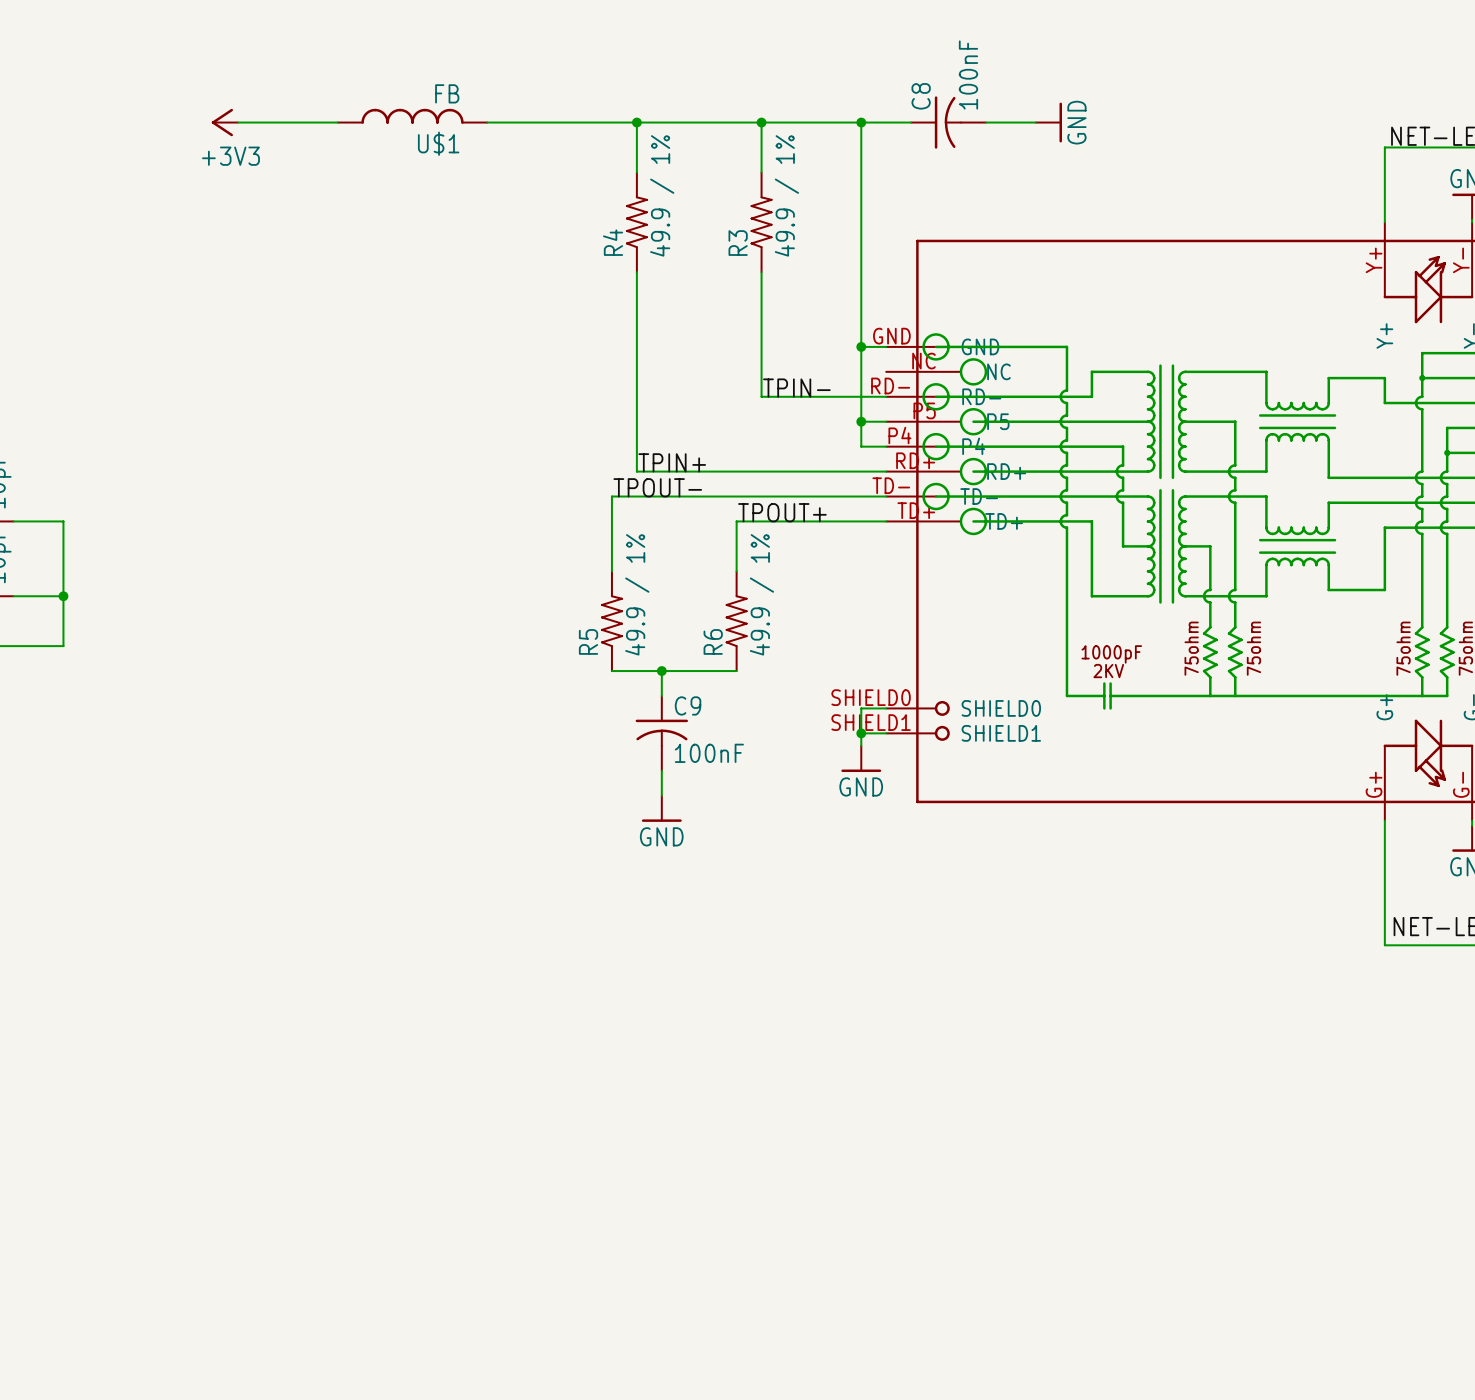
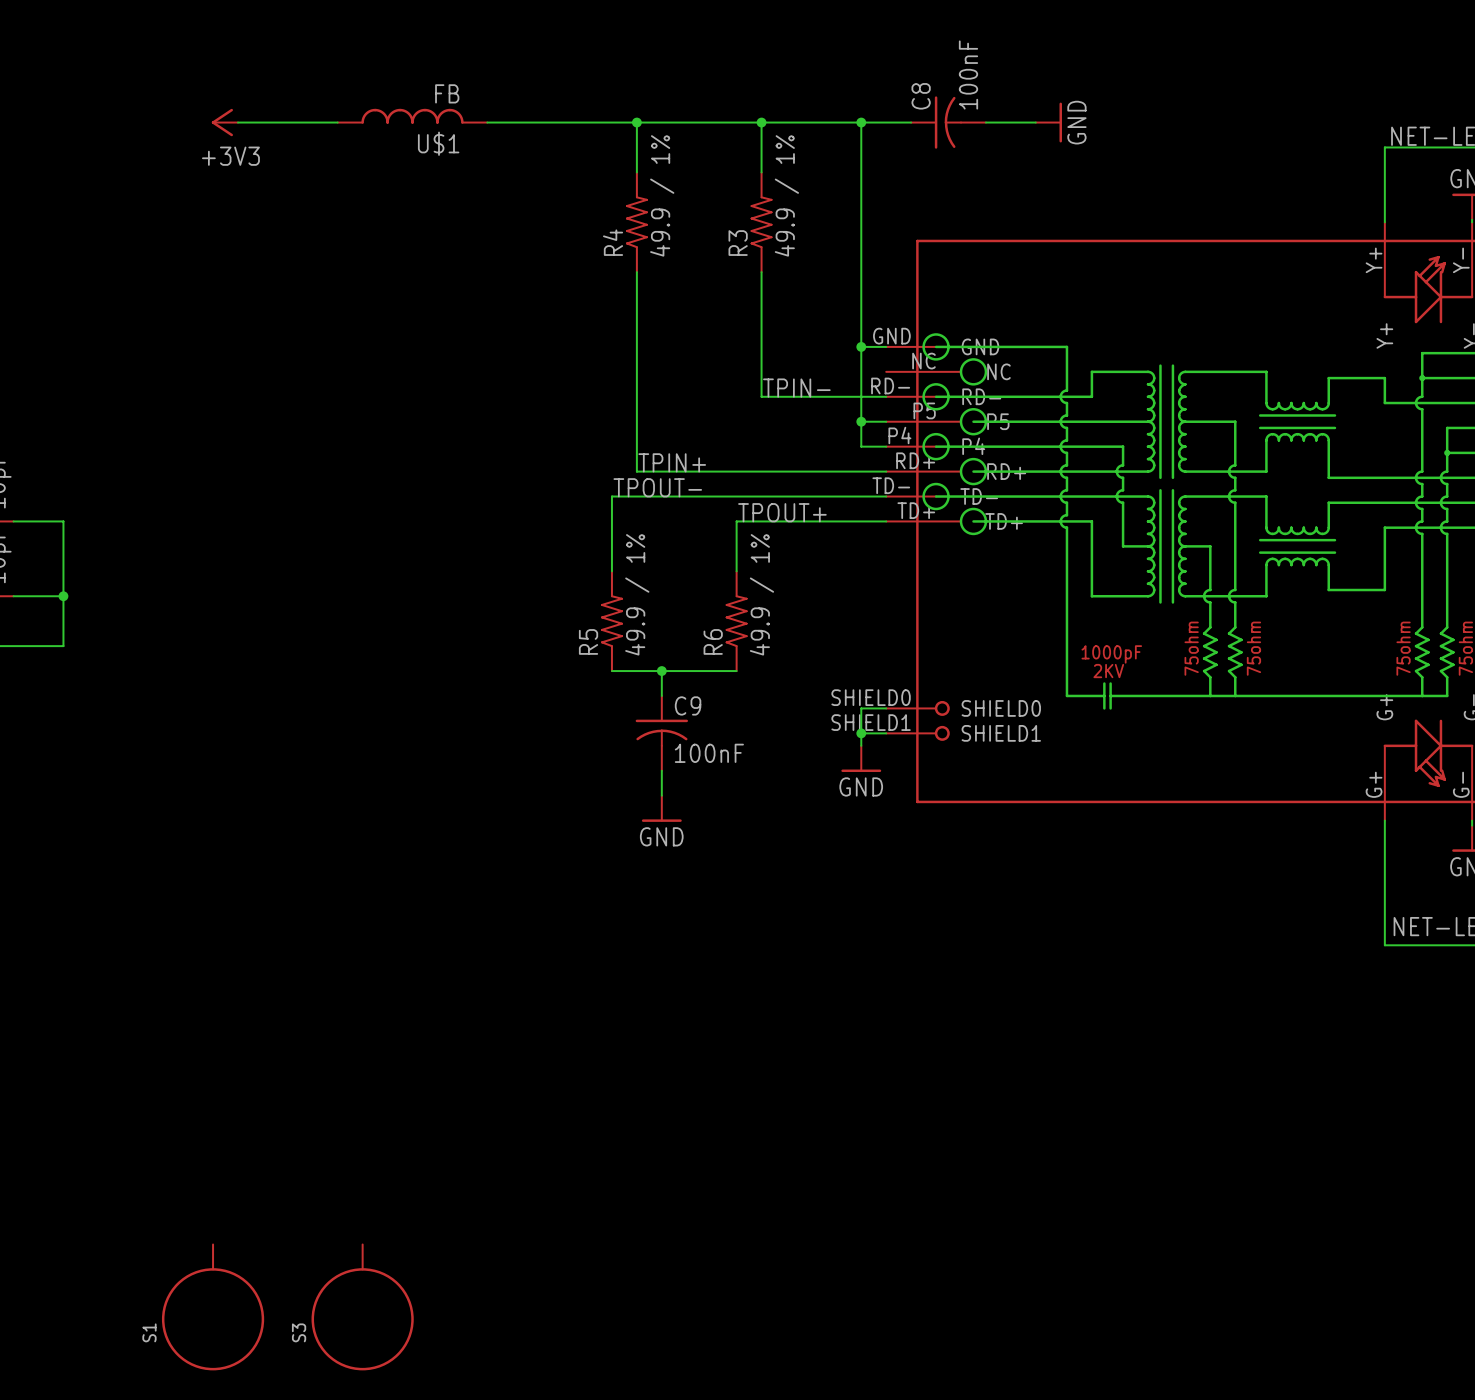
S1: none -> (213, 1307)
S3: none -> (362, 1307)

